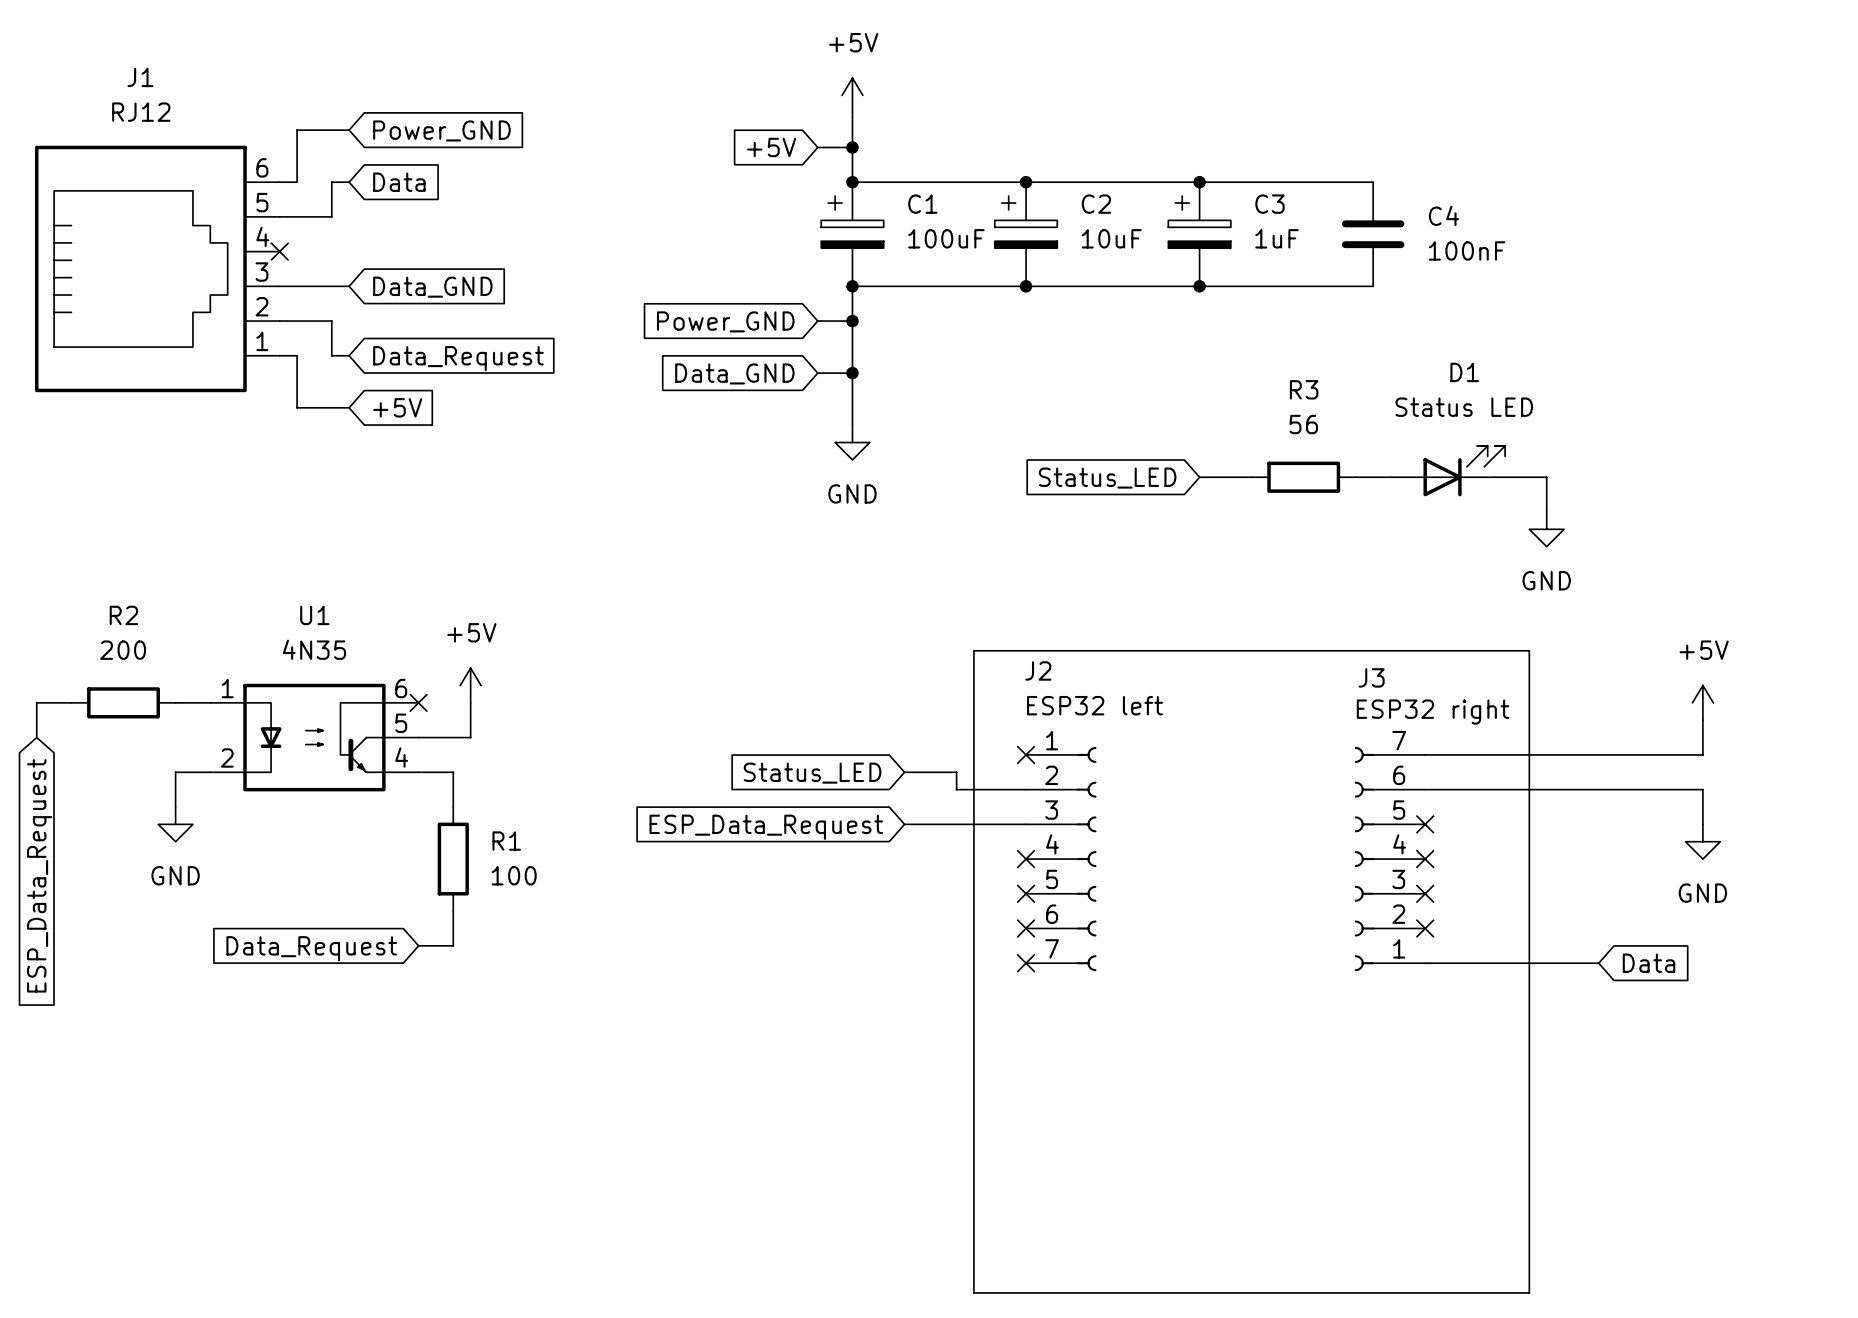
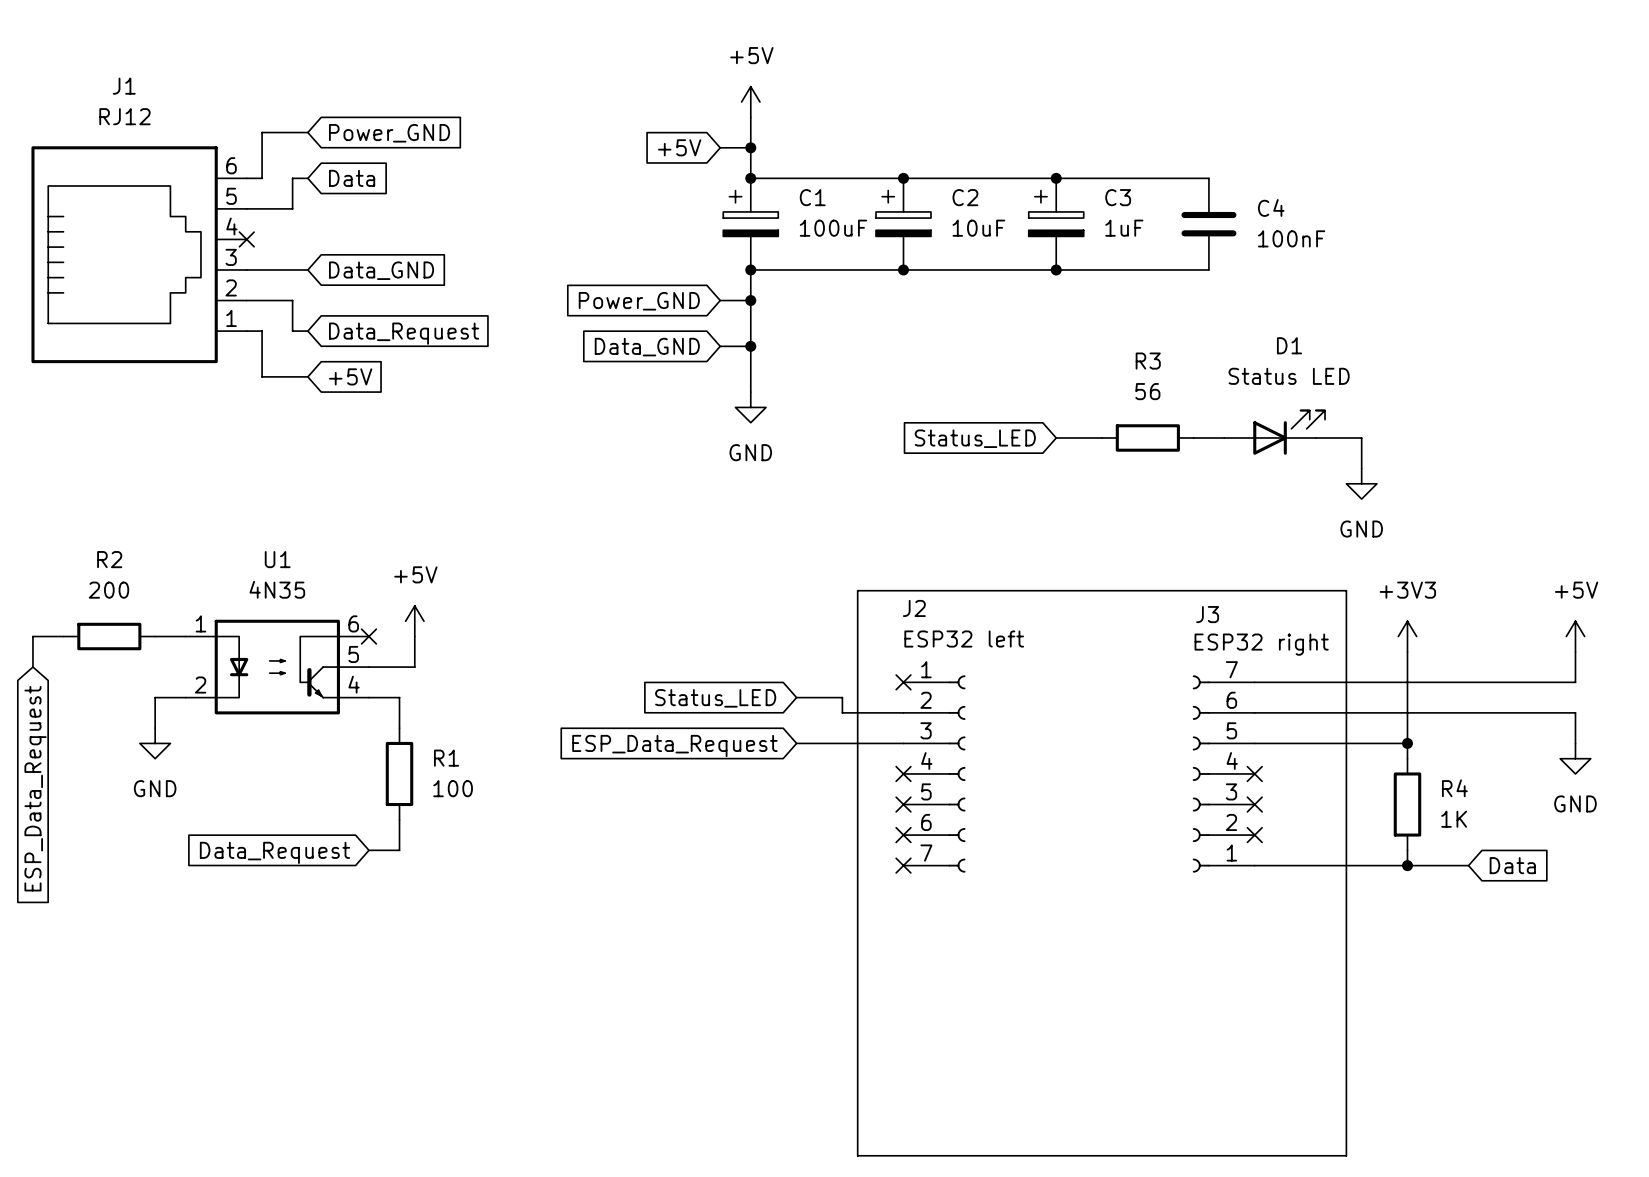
power symbol: none -> +3V3 (1407, 636)
power symbol position: +5V (1702, 702) -> +5V (1575, 636)
wire: none -> (1407, 651) (1407, 758)
wire: (1702, 720) (1702, 754) -> (1575, 651) (1575, 682) (1499, 682)
wire: (1702, 789) (1702, 824) -> (1499, 712) (1575, 712) (1575, 743)
wire: none -> (1254, 743) (1407, 743)
no-connect mark: (1425, 824) -> none
junction: none -> (1407, 743)
power symbol position: GND (1702, 841) -> GND (1575, 758)
R4: none -> 1K (1407, 804)
wire: none -> (1407, 850) (1407, 865) (1468, 865)
junction: none -> (1407, 865)
global label position: Data (1649, 963) -> Data (1512, 865)

